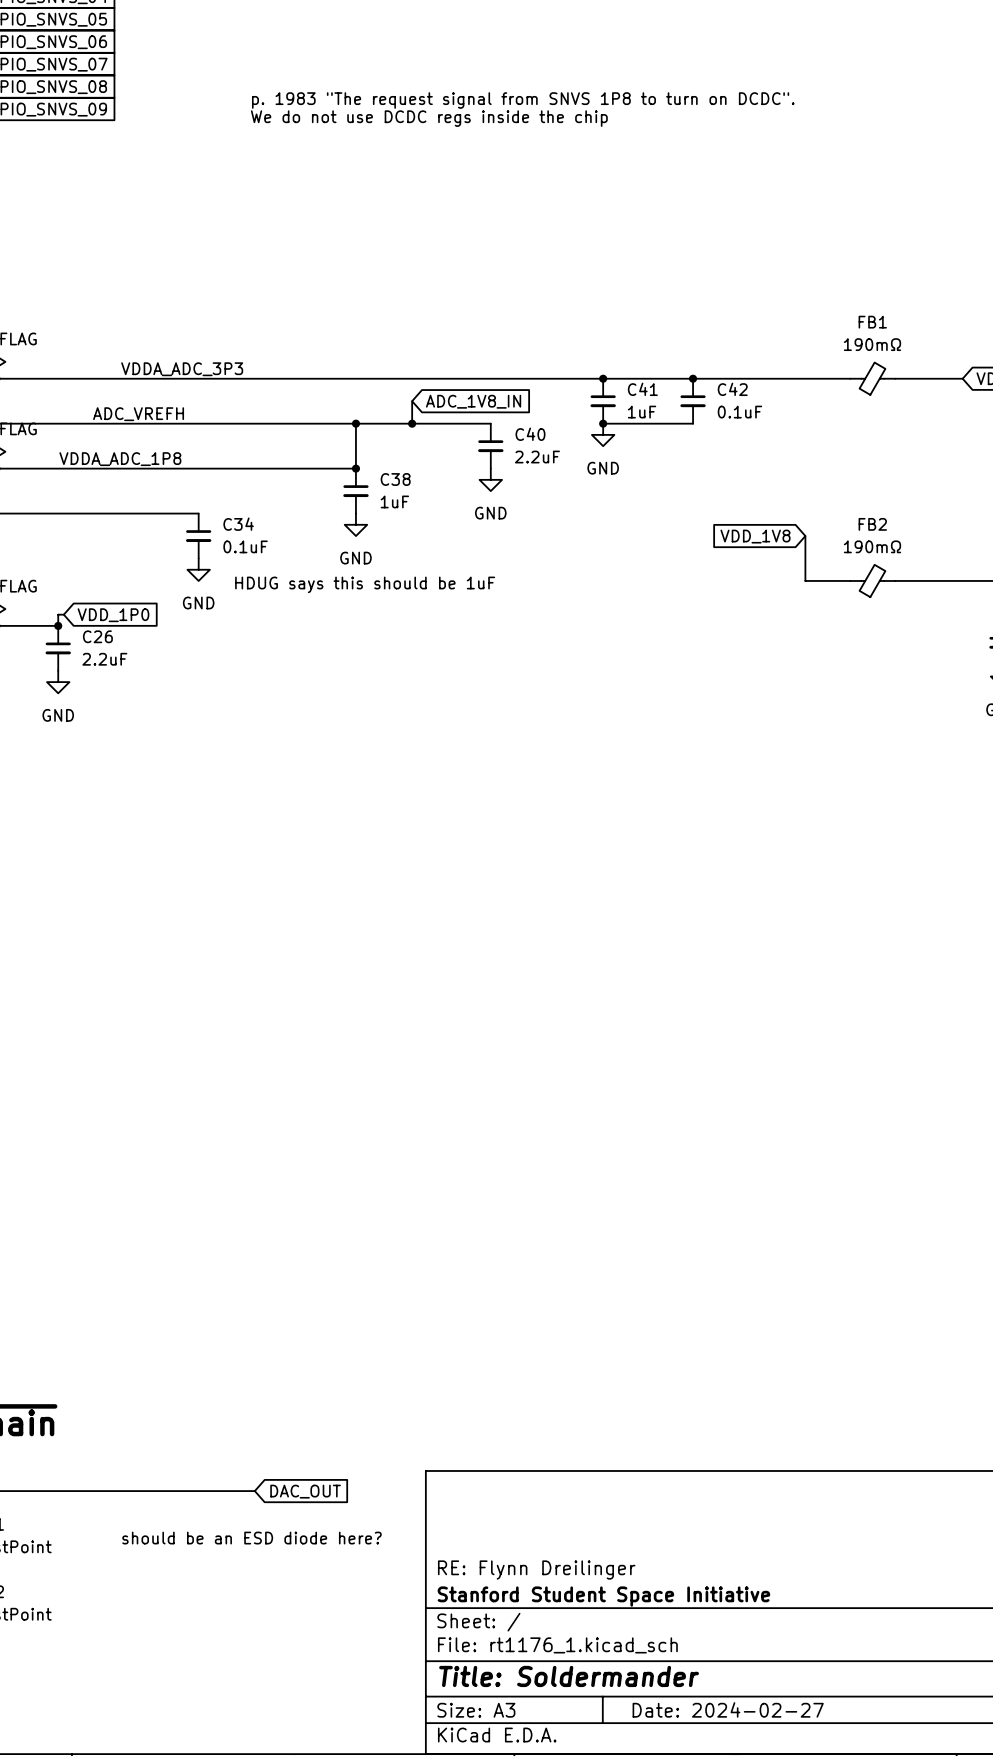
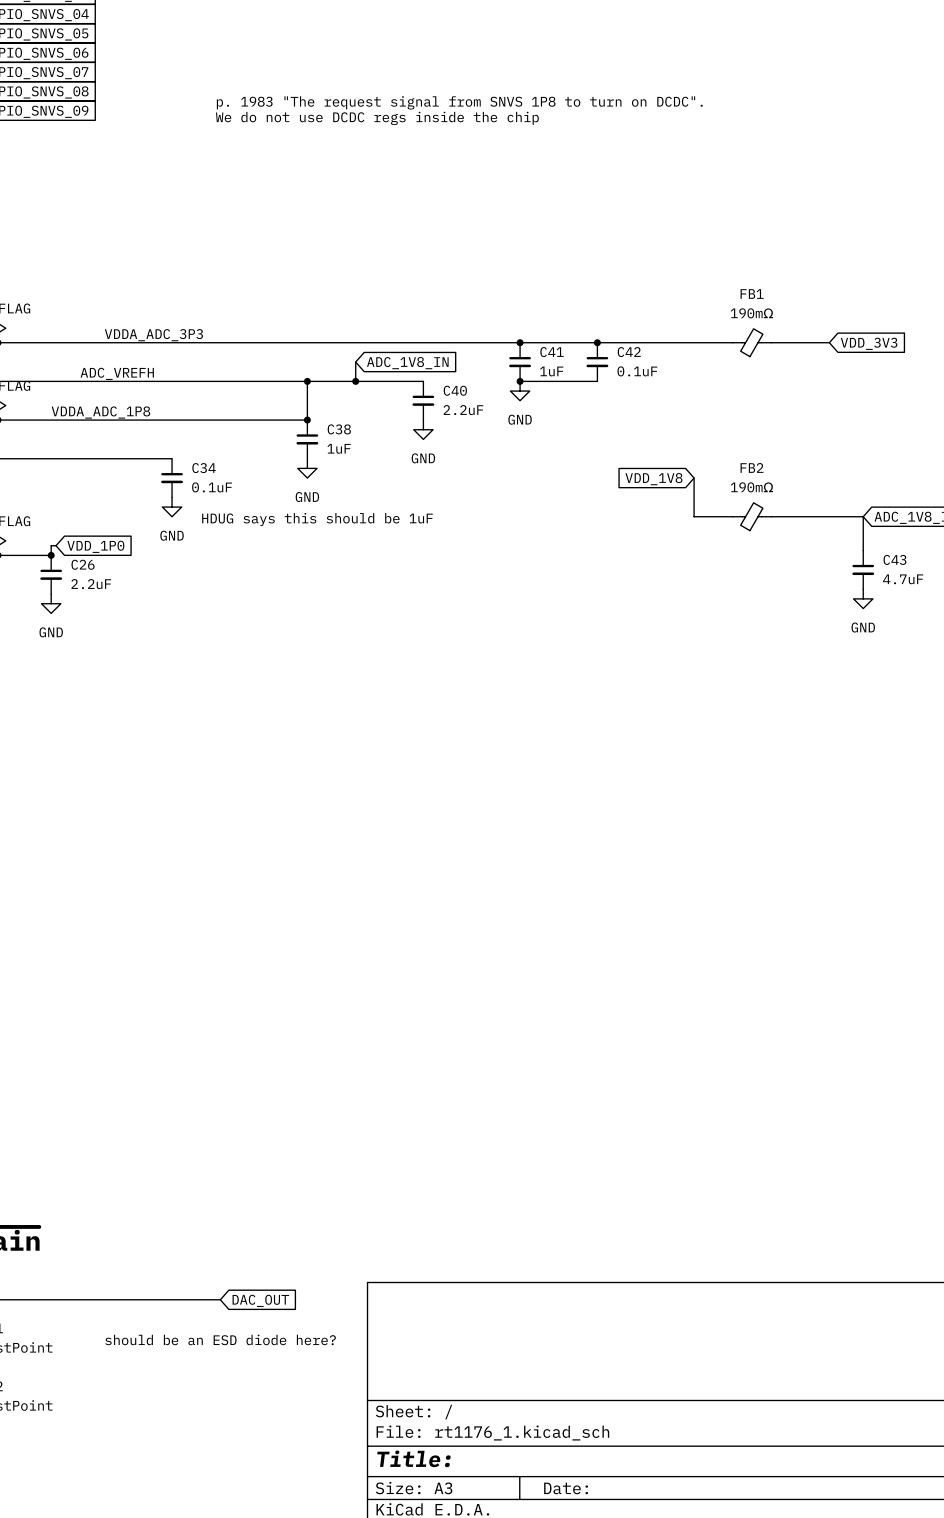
title block: RE: Flynn Dreilinger (536, 1570) -> none
title block: Stanford Student Space Initiative (603, 1596) -> none
title block: Title: Soldermander (569, 1676) -> Title: (413, 1458)
title block: Date: 2024-02-27 (728, 1709) -> Date: (566, 1488)

